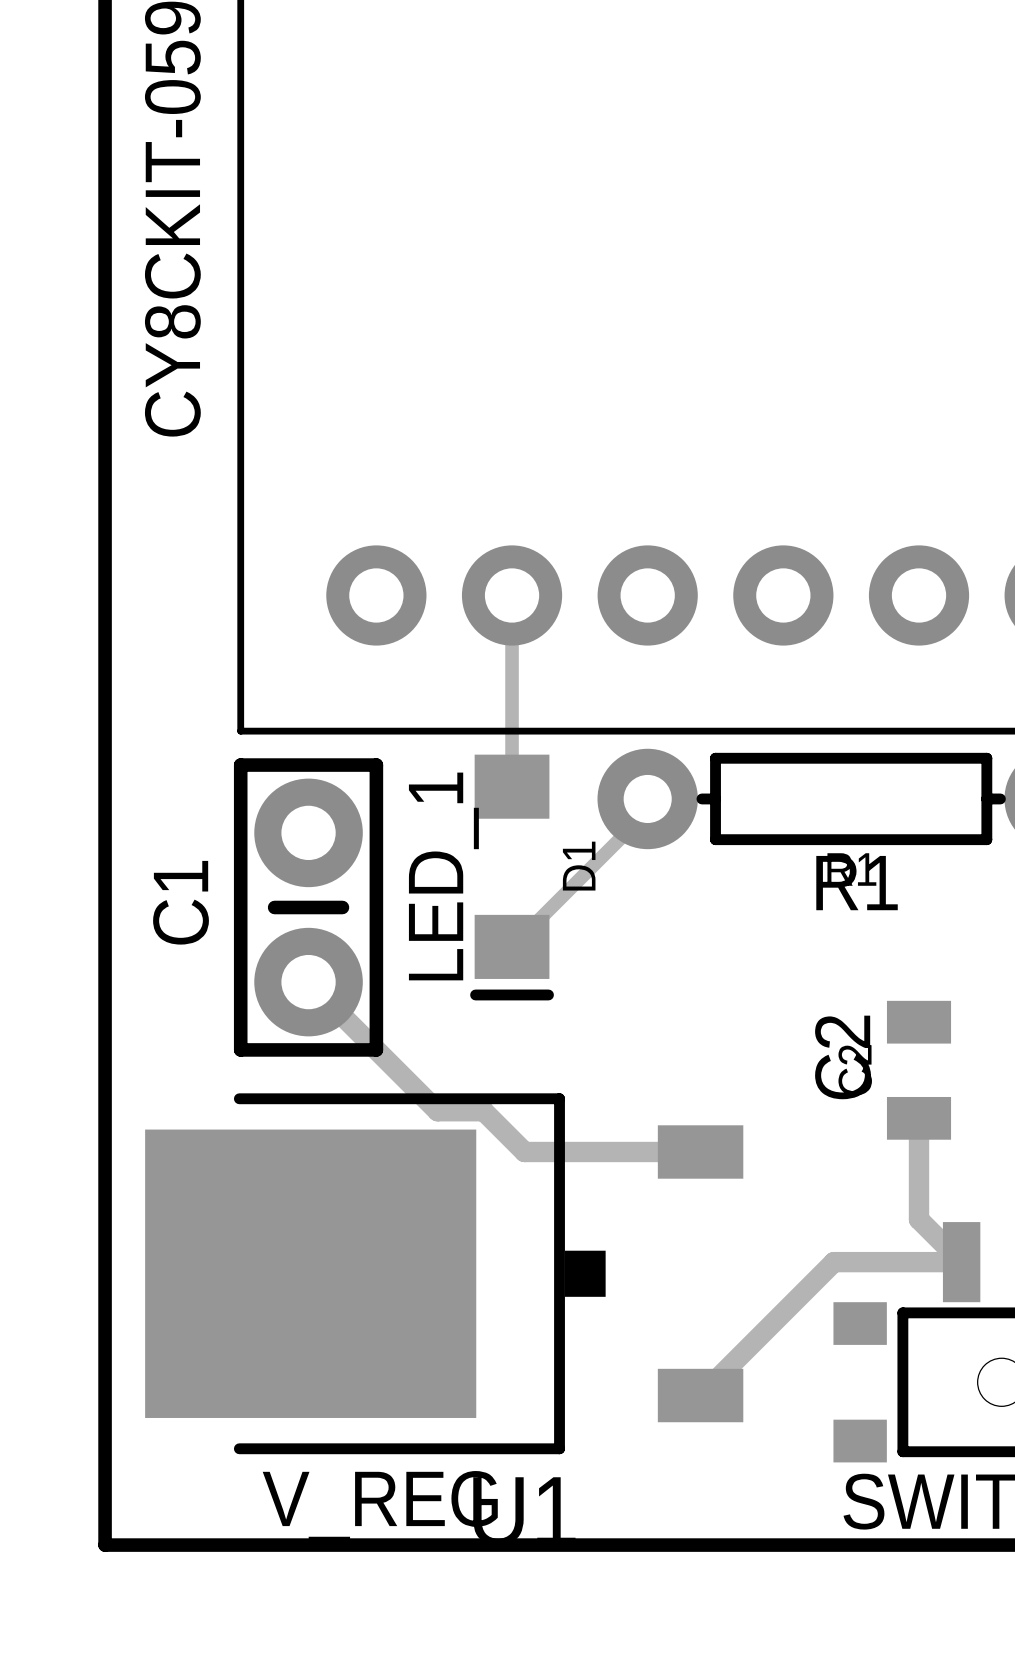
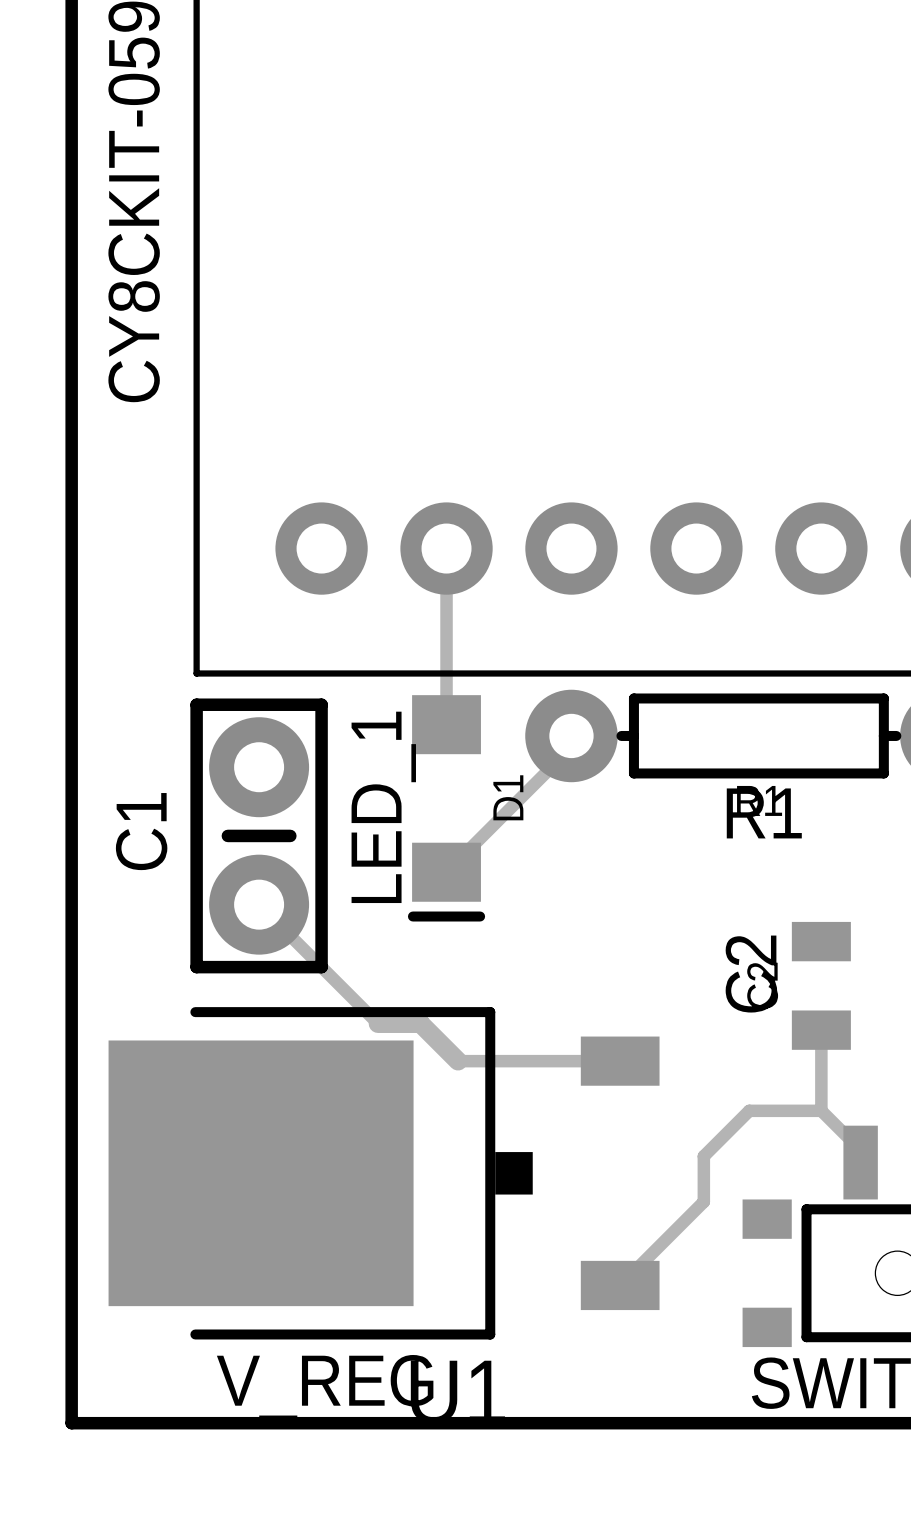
track width: thick (308, 982) (437, 1111) -> thin (259, 904) (378, 1023)
track width: thick (919, 1118) (919, 1205) -> thin (821, 1030) (821, 1110)
track width: thick (524, 1152) (700, 1152) -> thin (458, 1061) (620, 1061)
track: (919, 1205) (919, 1219) (961, 1262) (833, 1262) (791, 1304) -> (860, 1162) (860, 1150) (821, 1110) (749, 1110) (703, 1156) (703, 1201)
track width: thick (791, 1304) (700, 1395) -> thin (703, 1201) (620, 1285)

